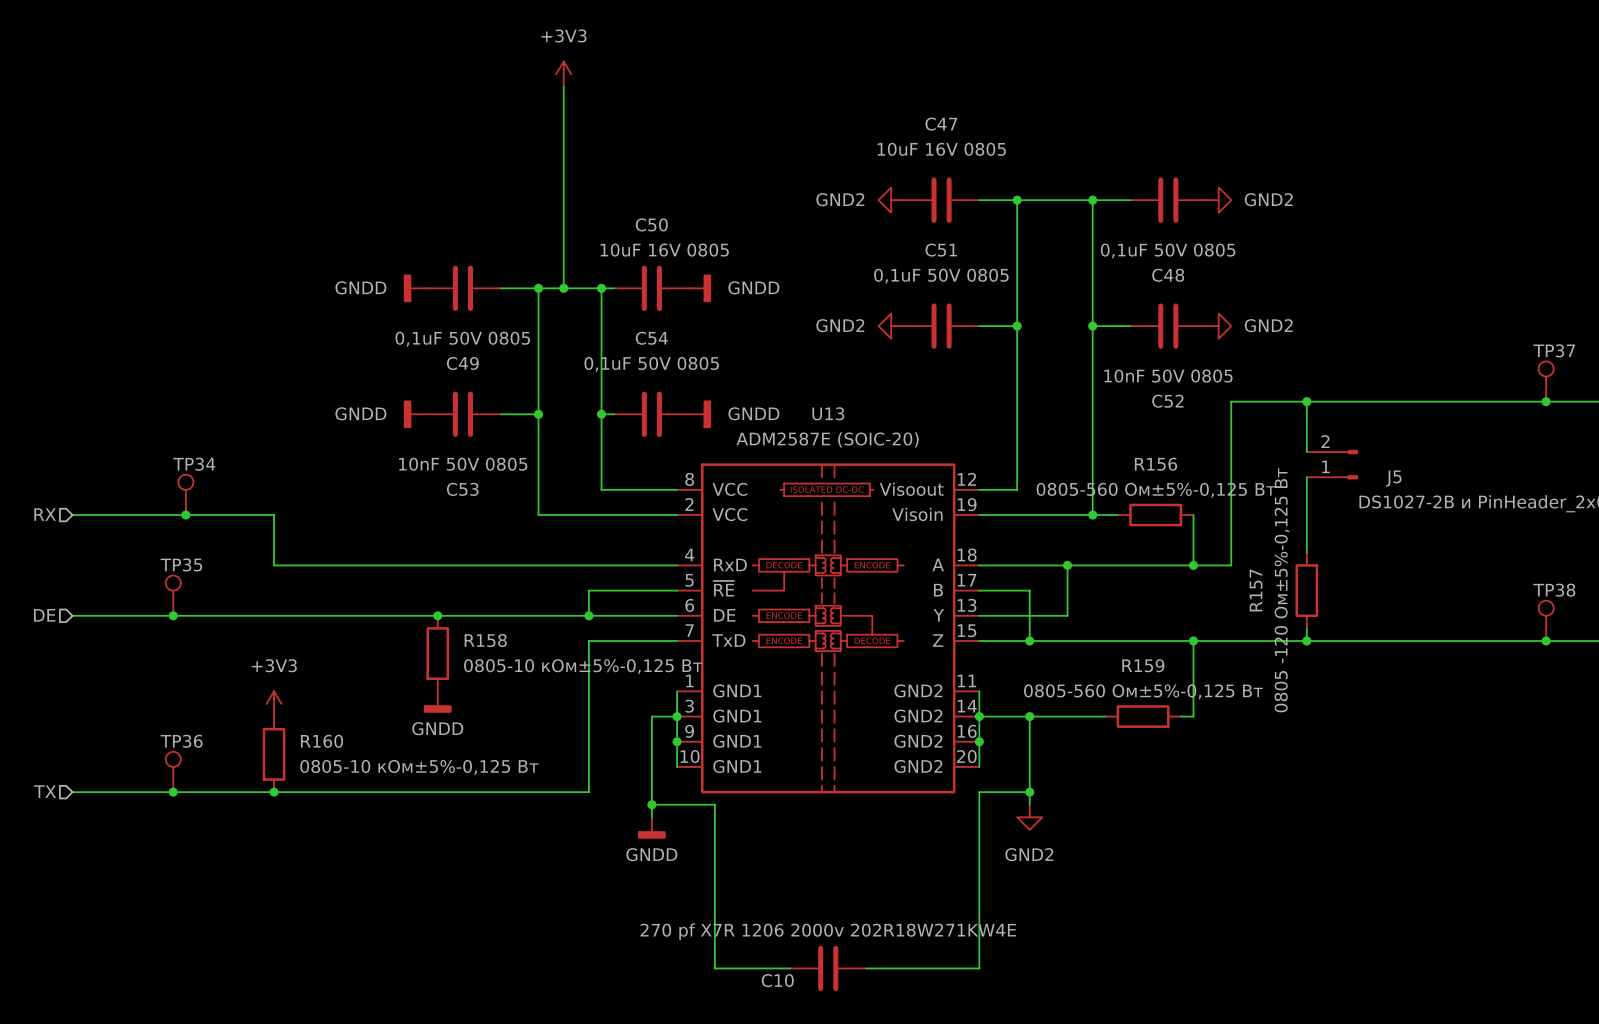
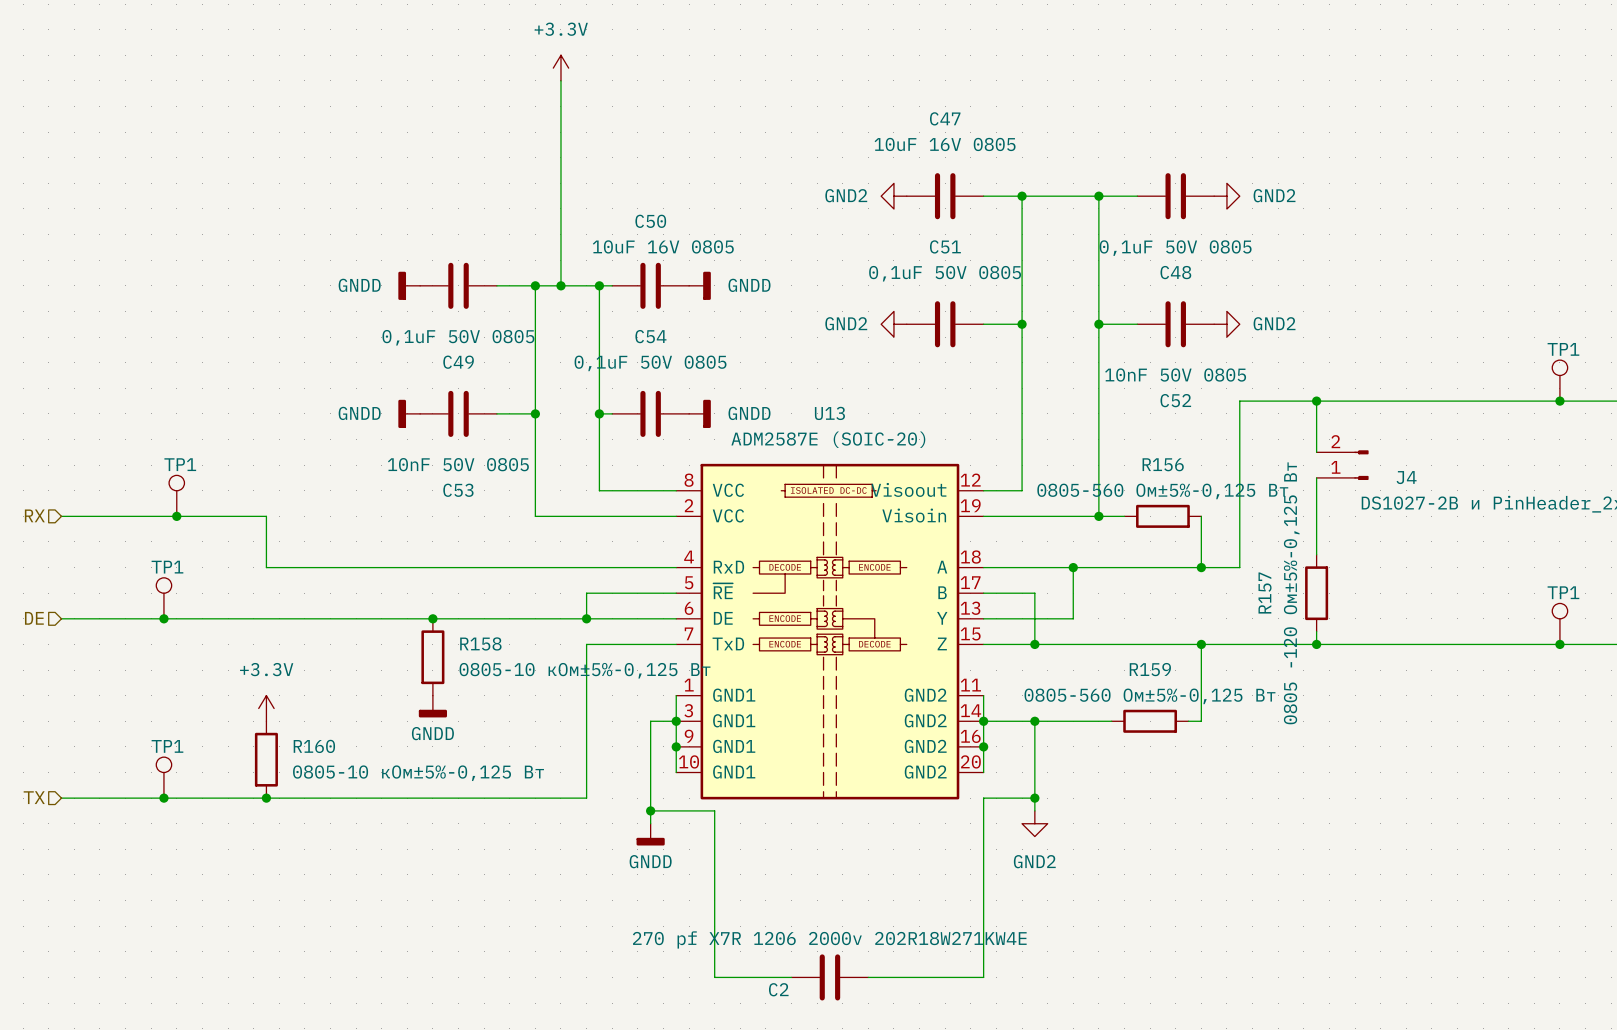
power symbol: +3V3 (563, 74) -> +3.3V (560, 68)
TP37 name: TP37 (1554, 350) -> TP1 (1563, 349)
TP34 name: TP34 (194, 464) -> TP1 (180, 464)
J5 name: J5 (1393, 478) -> J4 (1406, 477)
TP35 name: TP35 (181, 564) -> TP1 (167, 567)
TP38 name: TP38 (1554, 590) -> TP1 (1563, 592)
power symbol: +3V3 (274, 703) -> +3.3V (266, 708)
TP36 name: TP36 (181, 741) -> TP1 (167, 746)
C10 name: C10 (777, 980) -> C2 (778, 989)

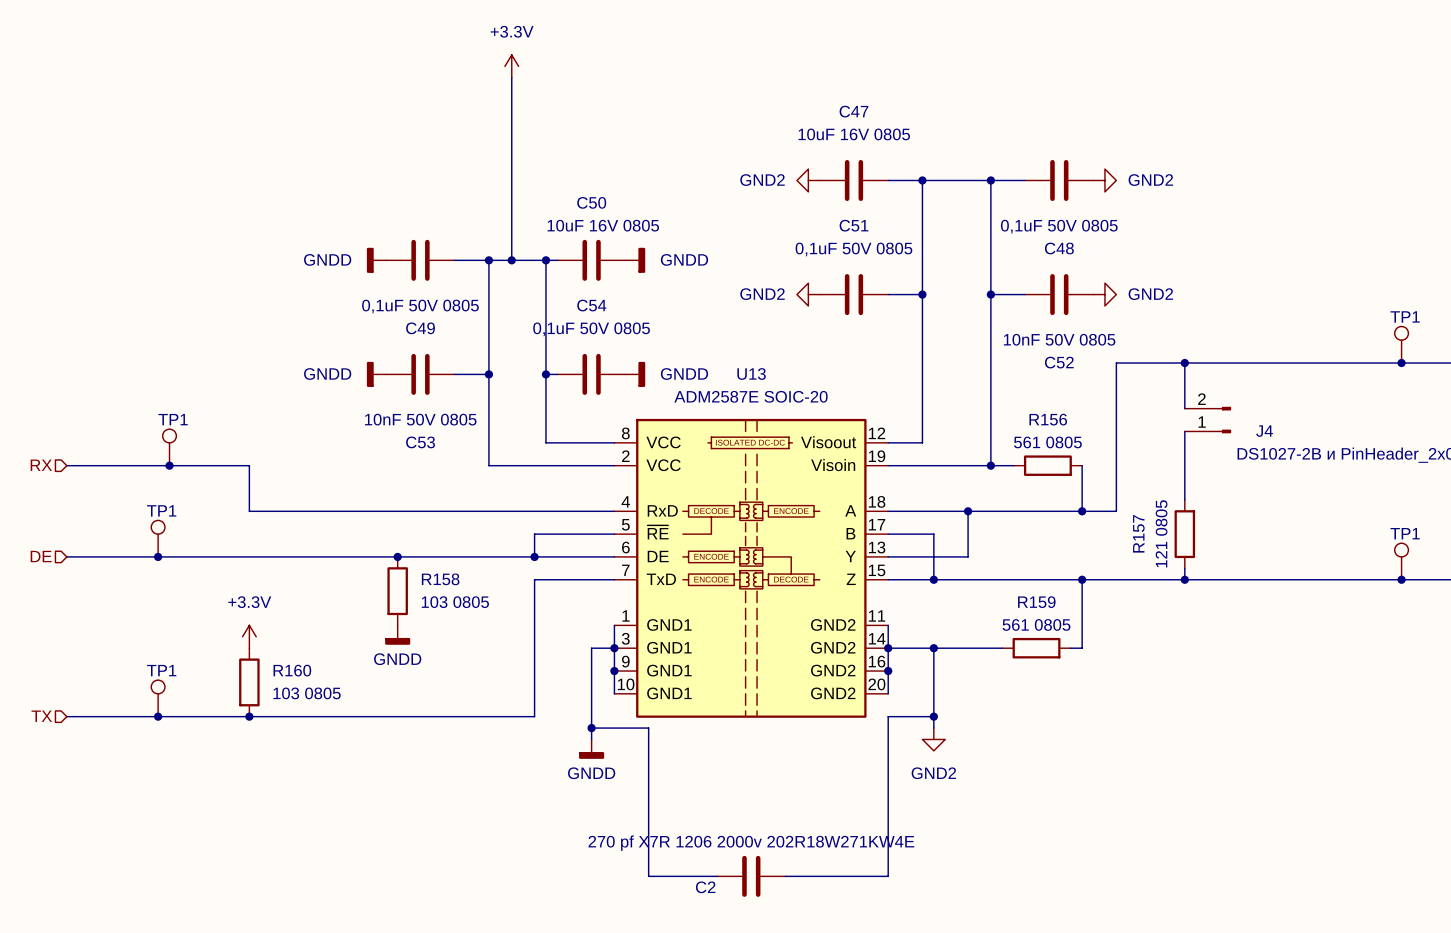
U13 value: ADM2587E (SOIC-20) (828, 439) -> ADM2587E SOIC-20 (751, 396)
R156 value: 0805-560 Ом±5%-0,125 Вт (1162, 491) -> 561 0805 (1047, 442)
R157 value: 0805 -120 Ом±5%-0,125 Вт (1291, 593) -> 121 0805 (1161, 533)
R158 value: 0805-10 кОм±5%-0,125 Вт (585, 670) -> 103 0805 (455, 602)
R159 value: 0805-560 Ом±5%-0,125 Вт (1149, 696) -> 561 0805 (1036, 624)
R160 value: 0805-10 кОм±5%-0,125 Вт (418, 773) -> 103 0805 (307, 693)

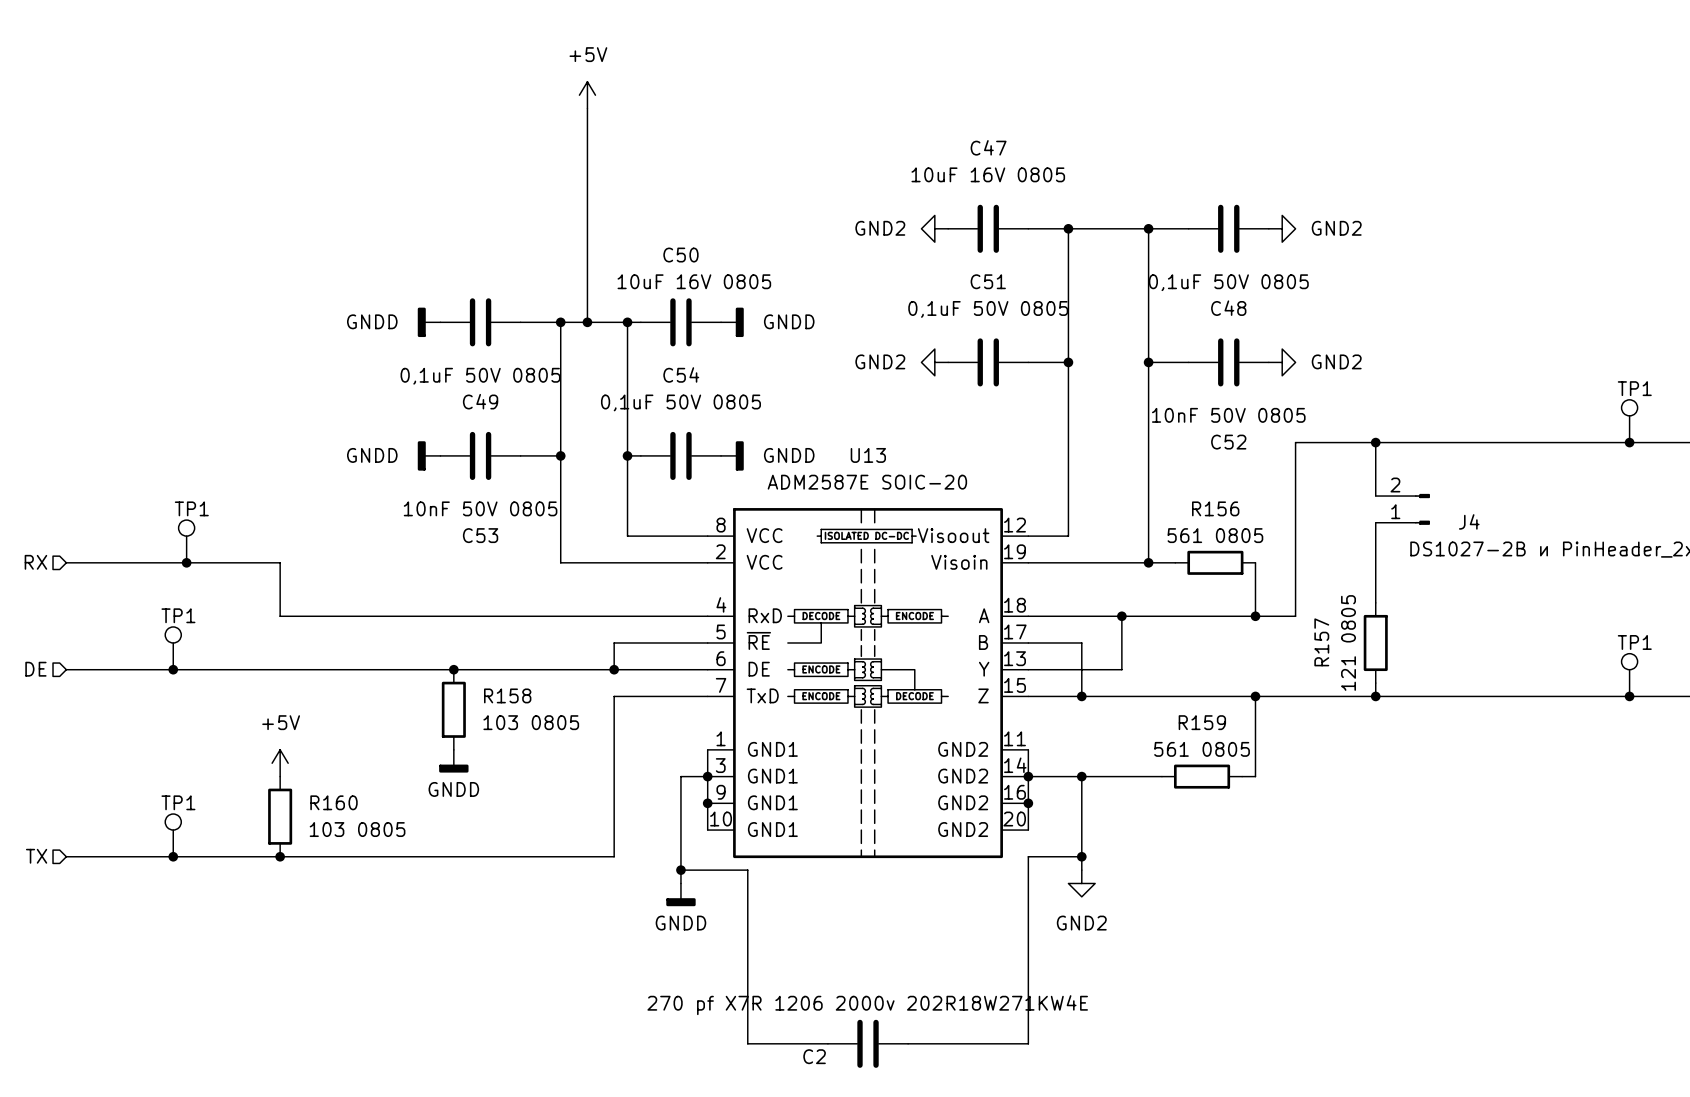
power symbol: +3.3V (511, 66) -> +5V (587, 95)
power symbol: +3.3V (249, 636) -> +5V (280, 763)

